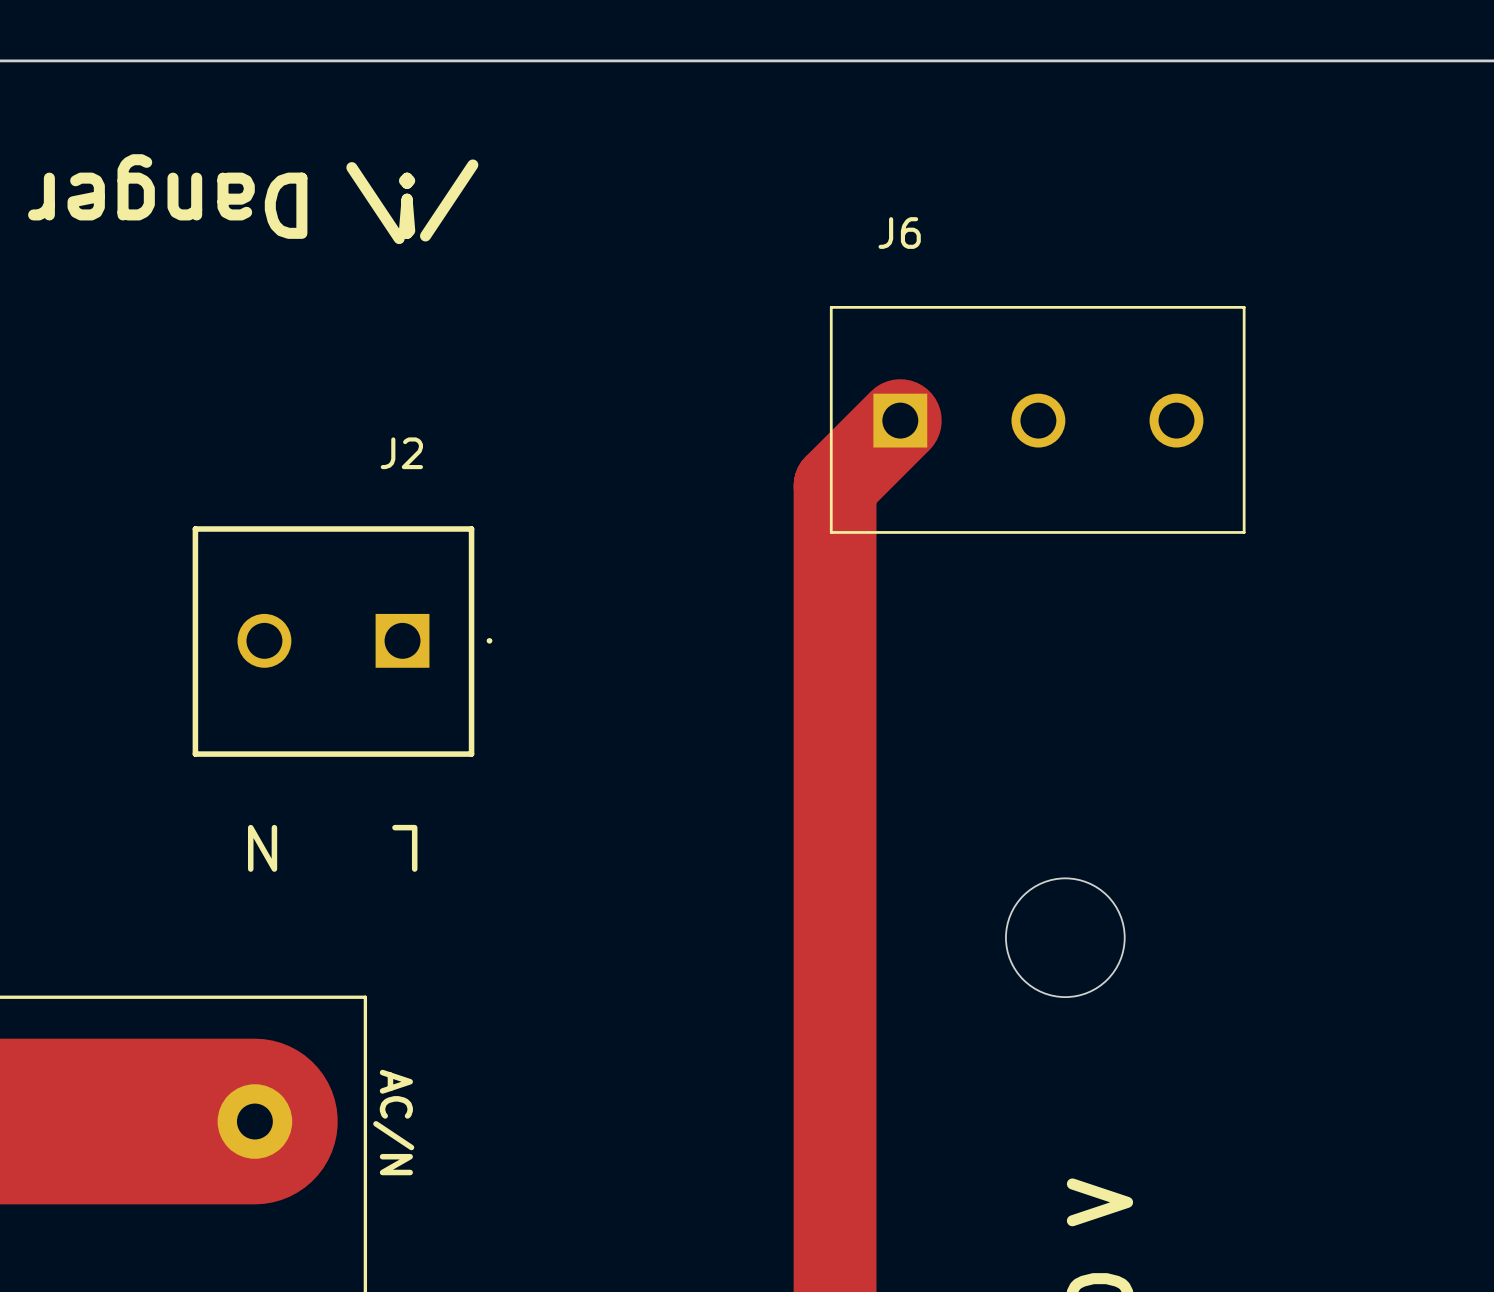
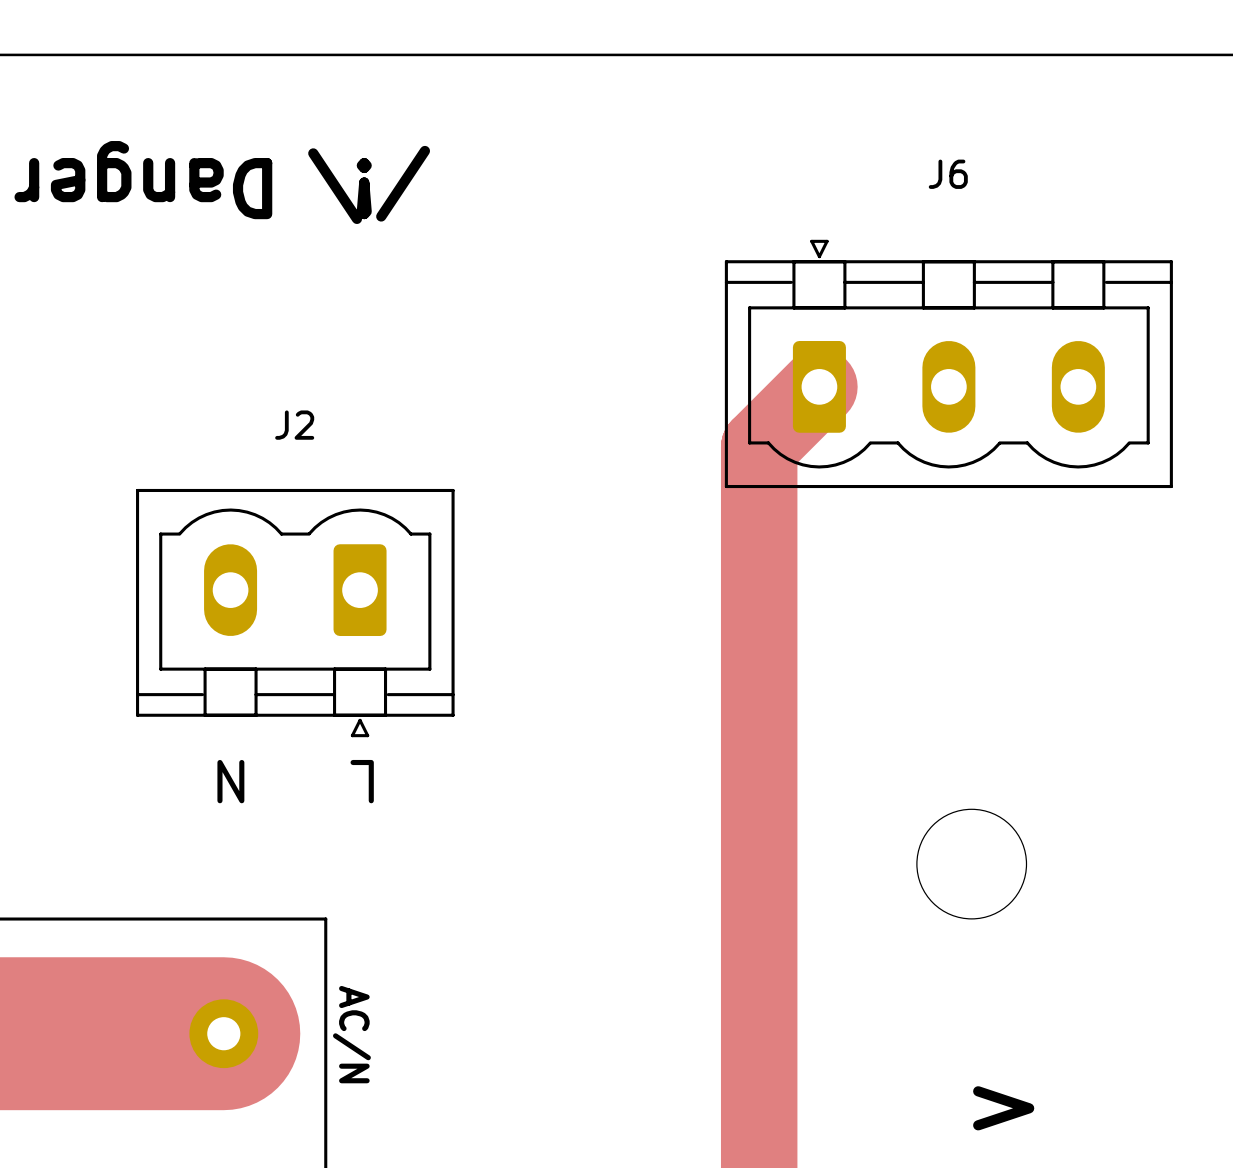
J6 name position: J6 (899, 233) -> J6 (948, 174)
J6 footprint: [829, 305, 1246, 534] -> [724, 239, 1173, 489]
J2 name position: J2 (401, 453) -> J2 (294, 425)
J2 footprint: [192, 526, 493, 757] -> [136, 488, 455, 738]

